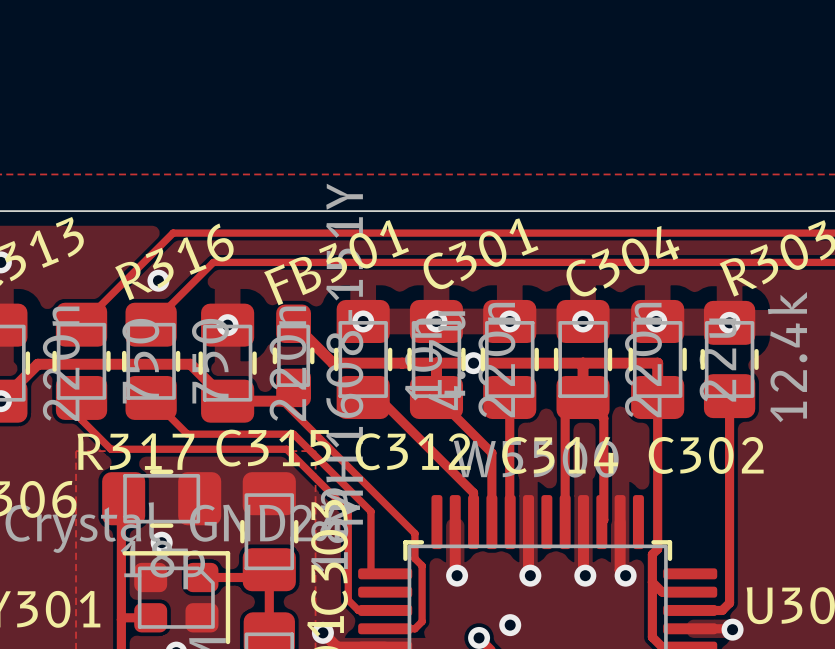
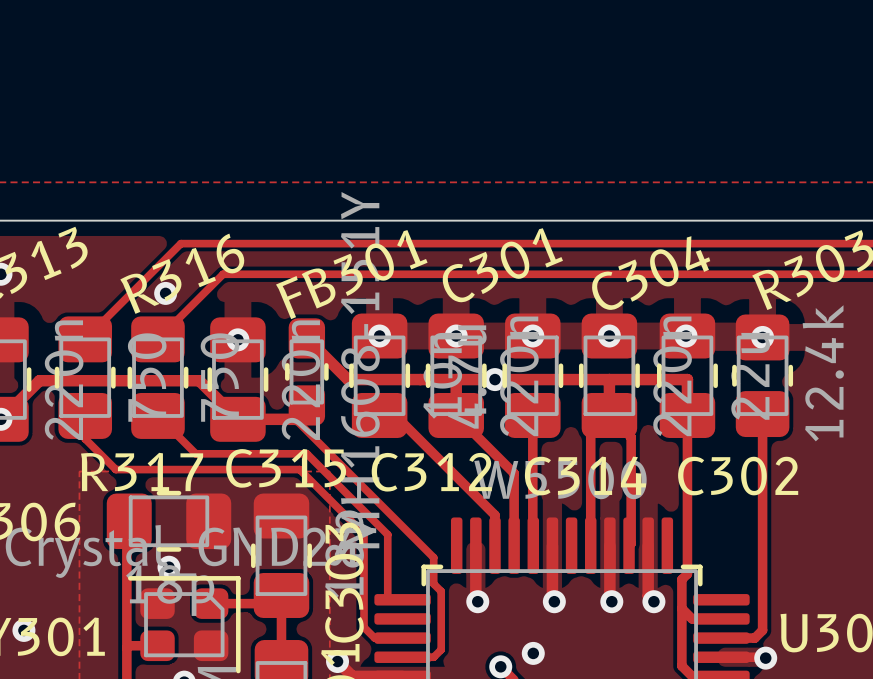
via: none -> (23, 630)

